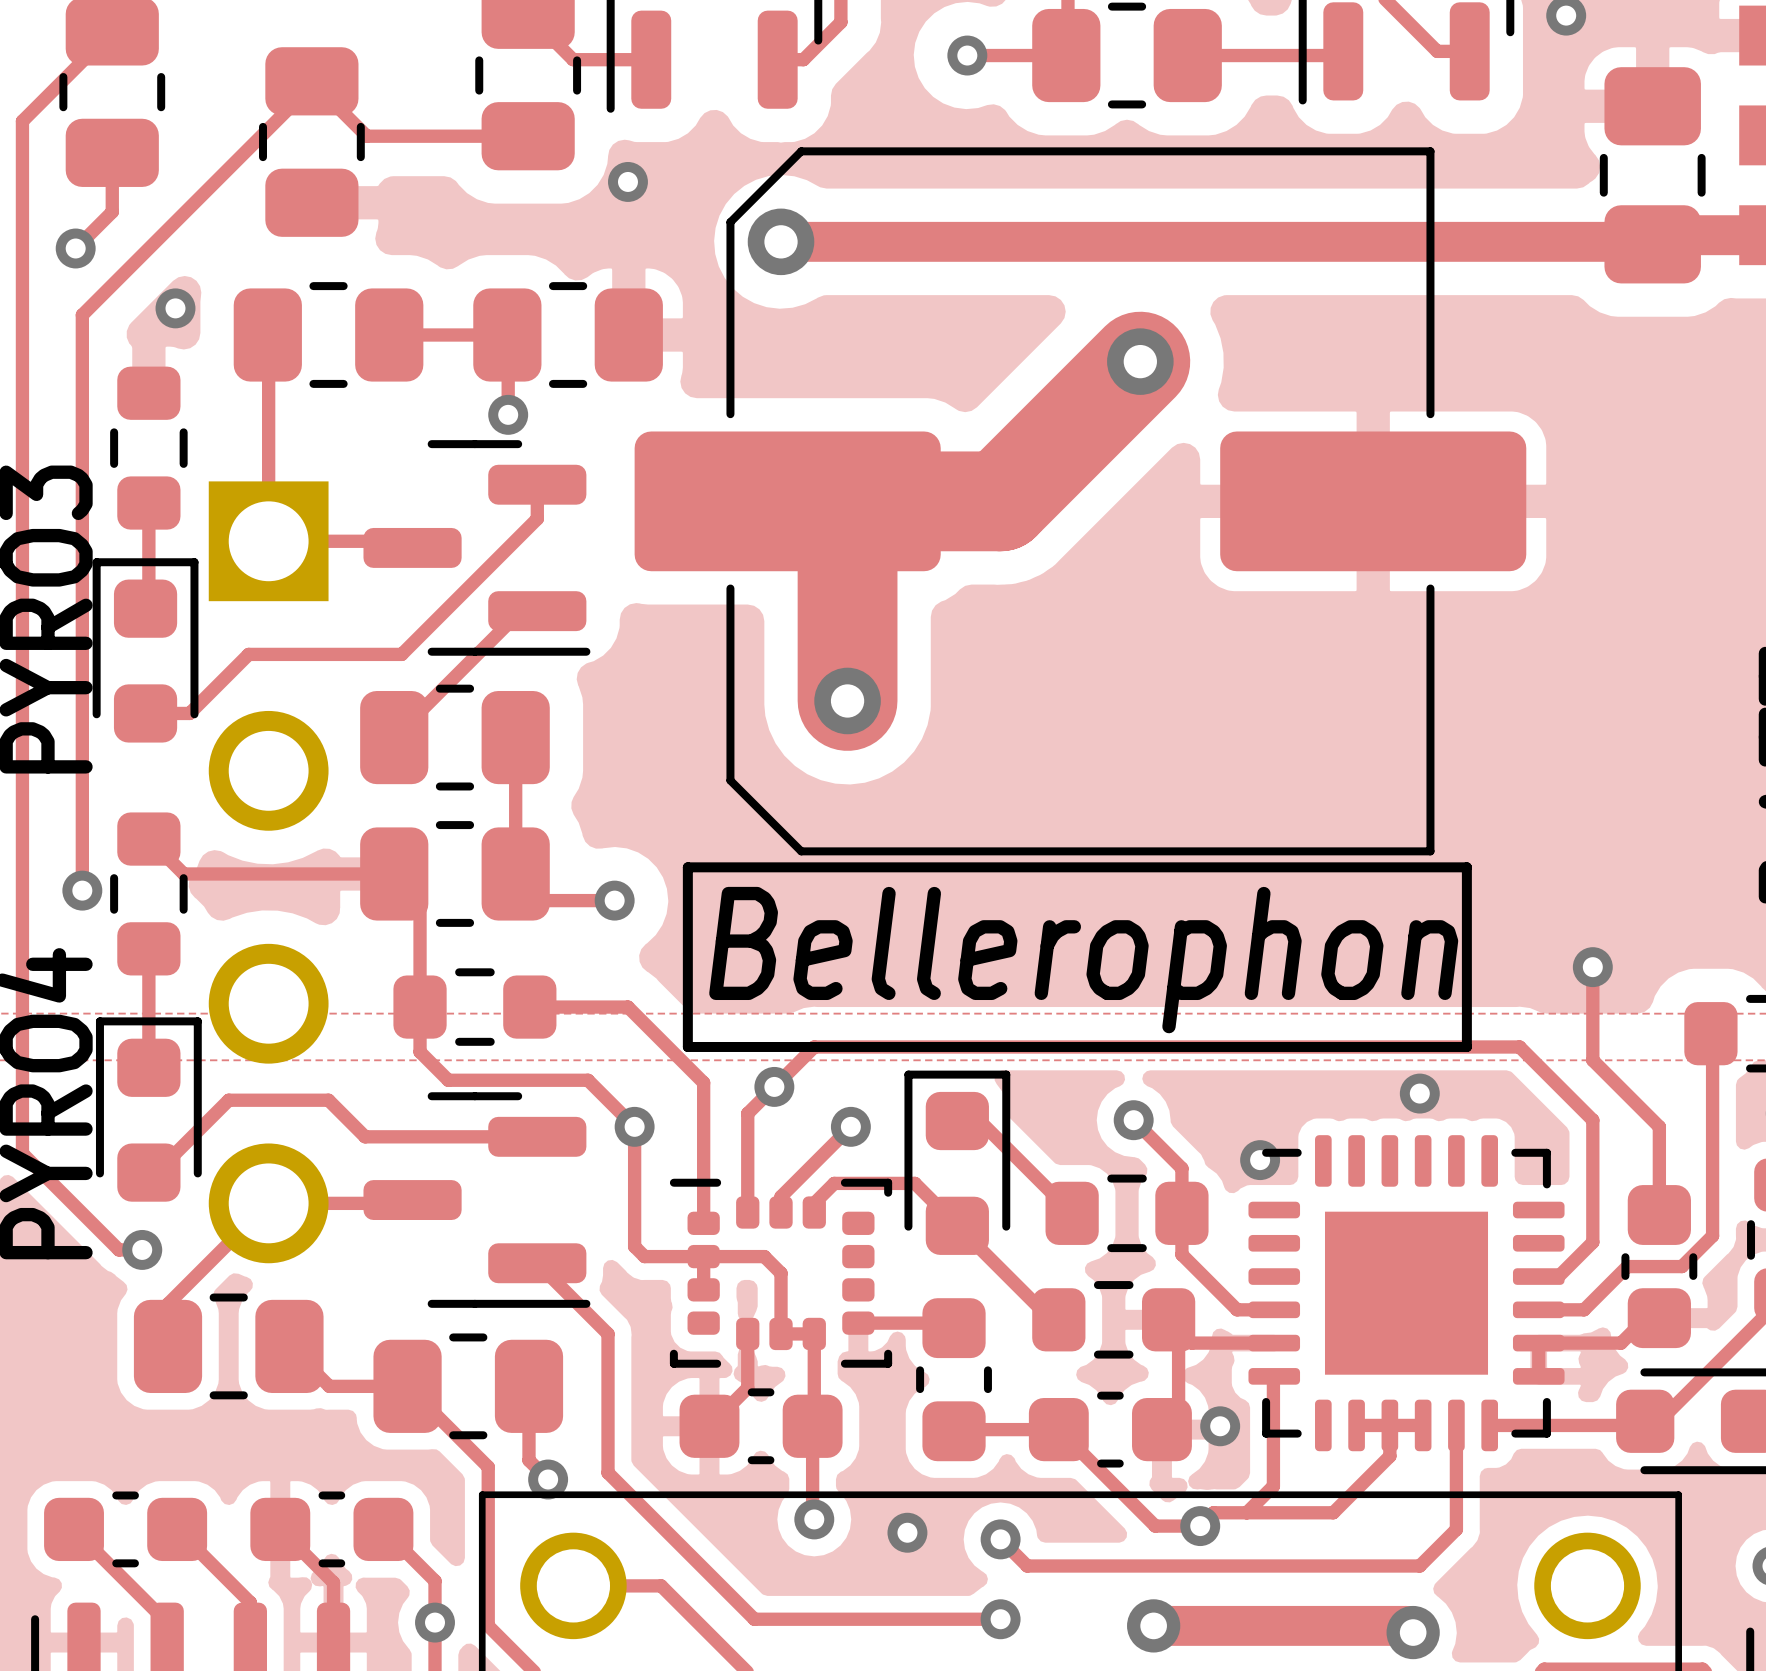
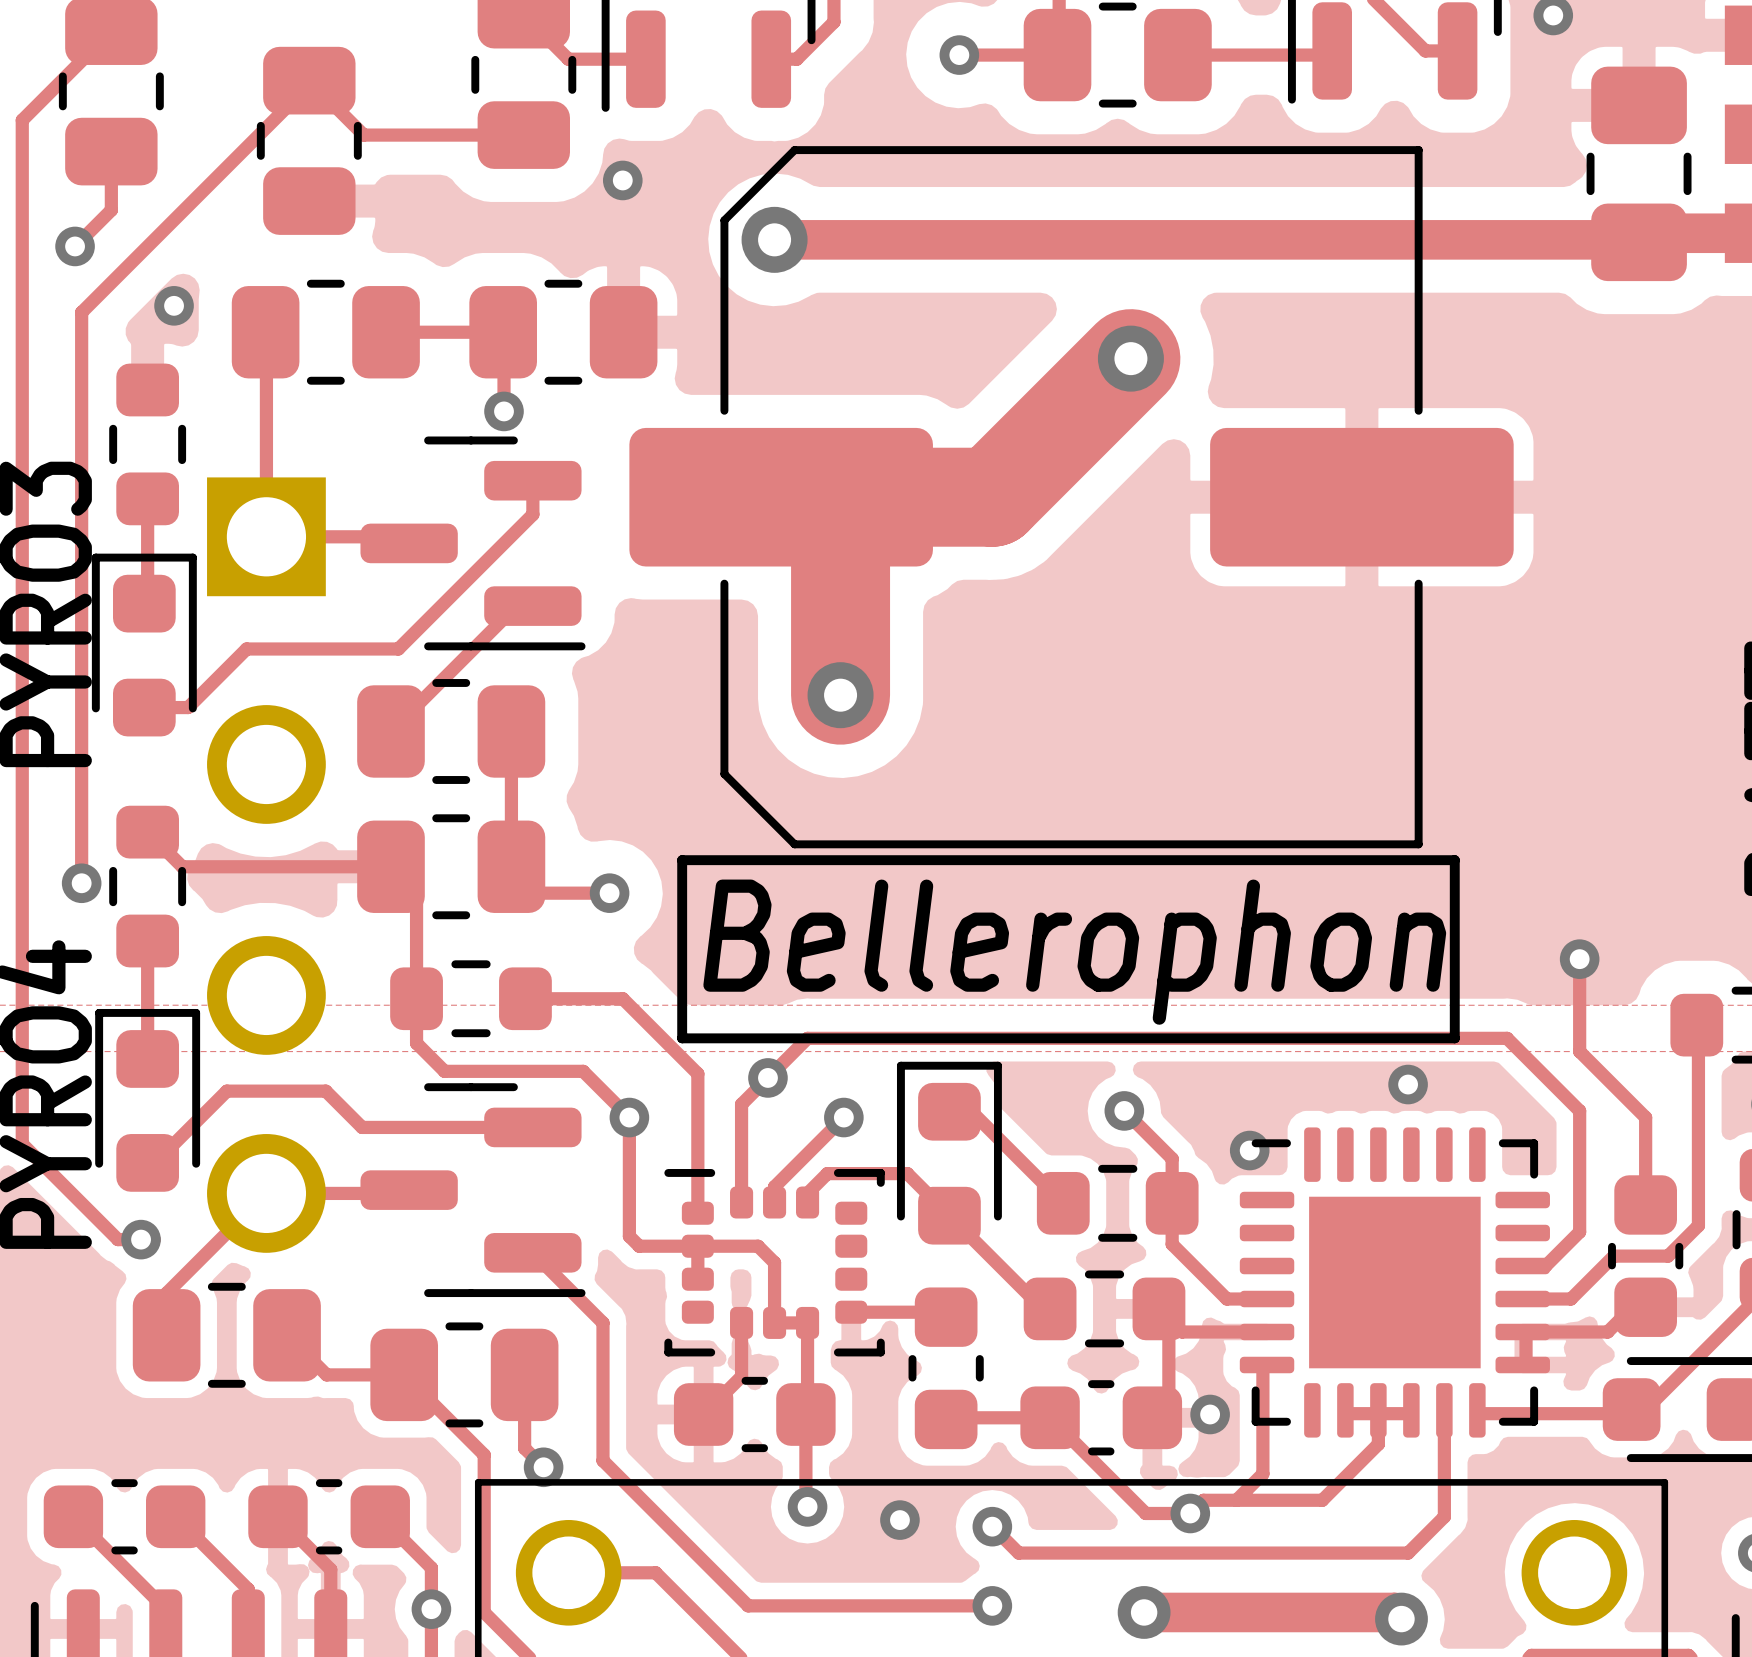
part footprint: [1248, 1135, 1565, 1452] -> [1239, 1127, 1550, 1438]

